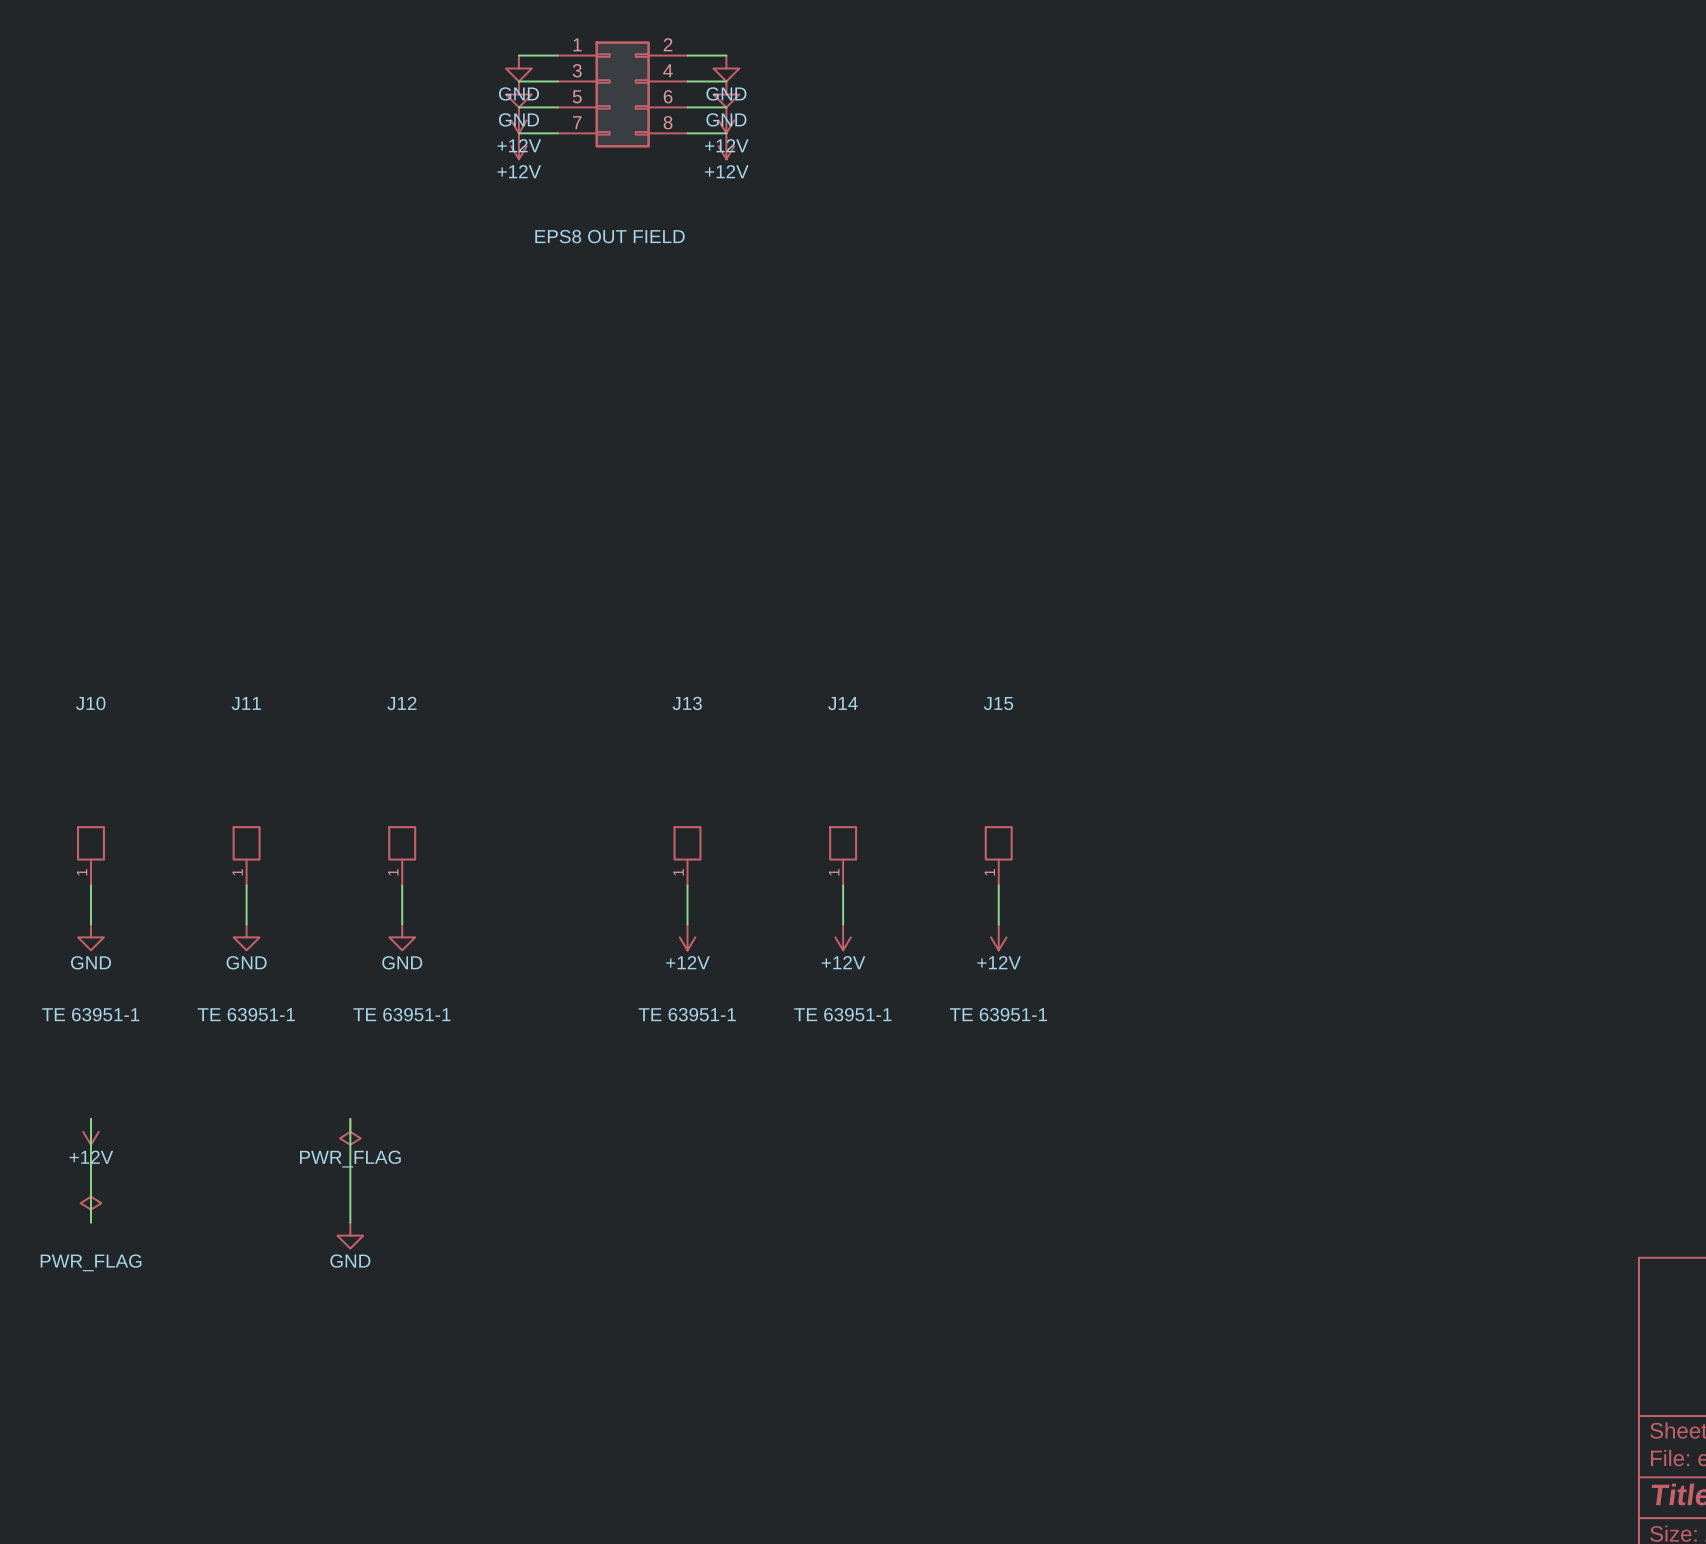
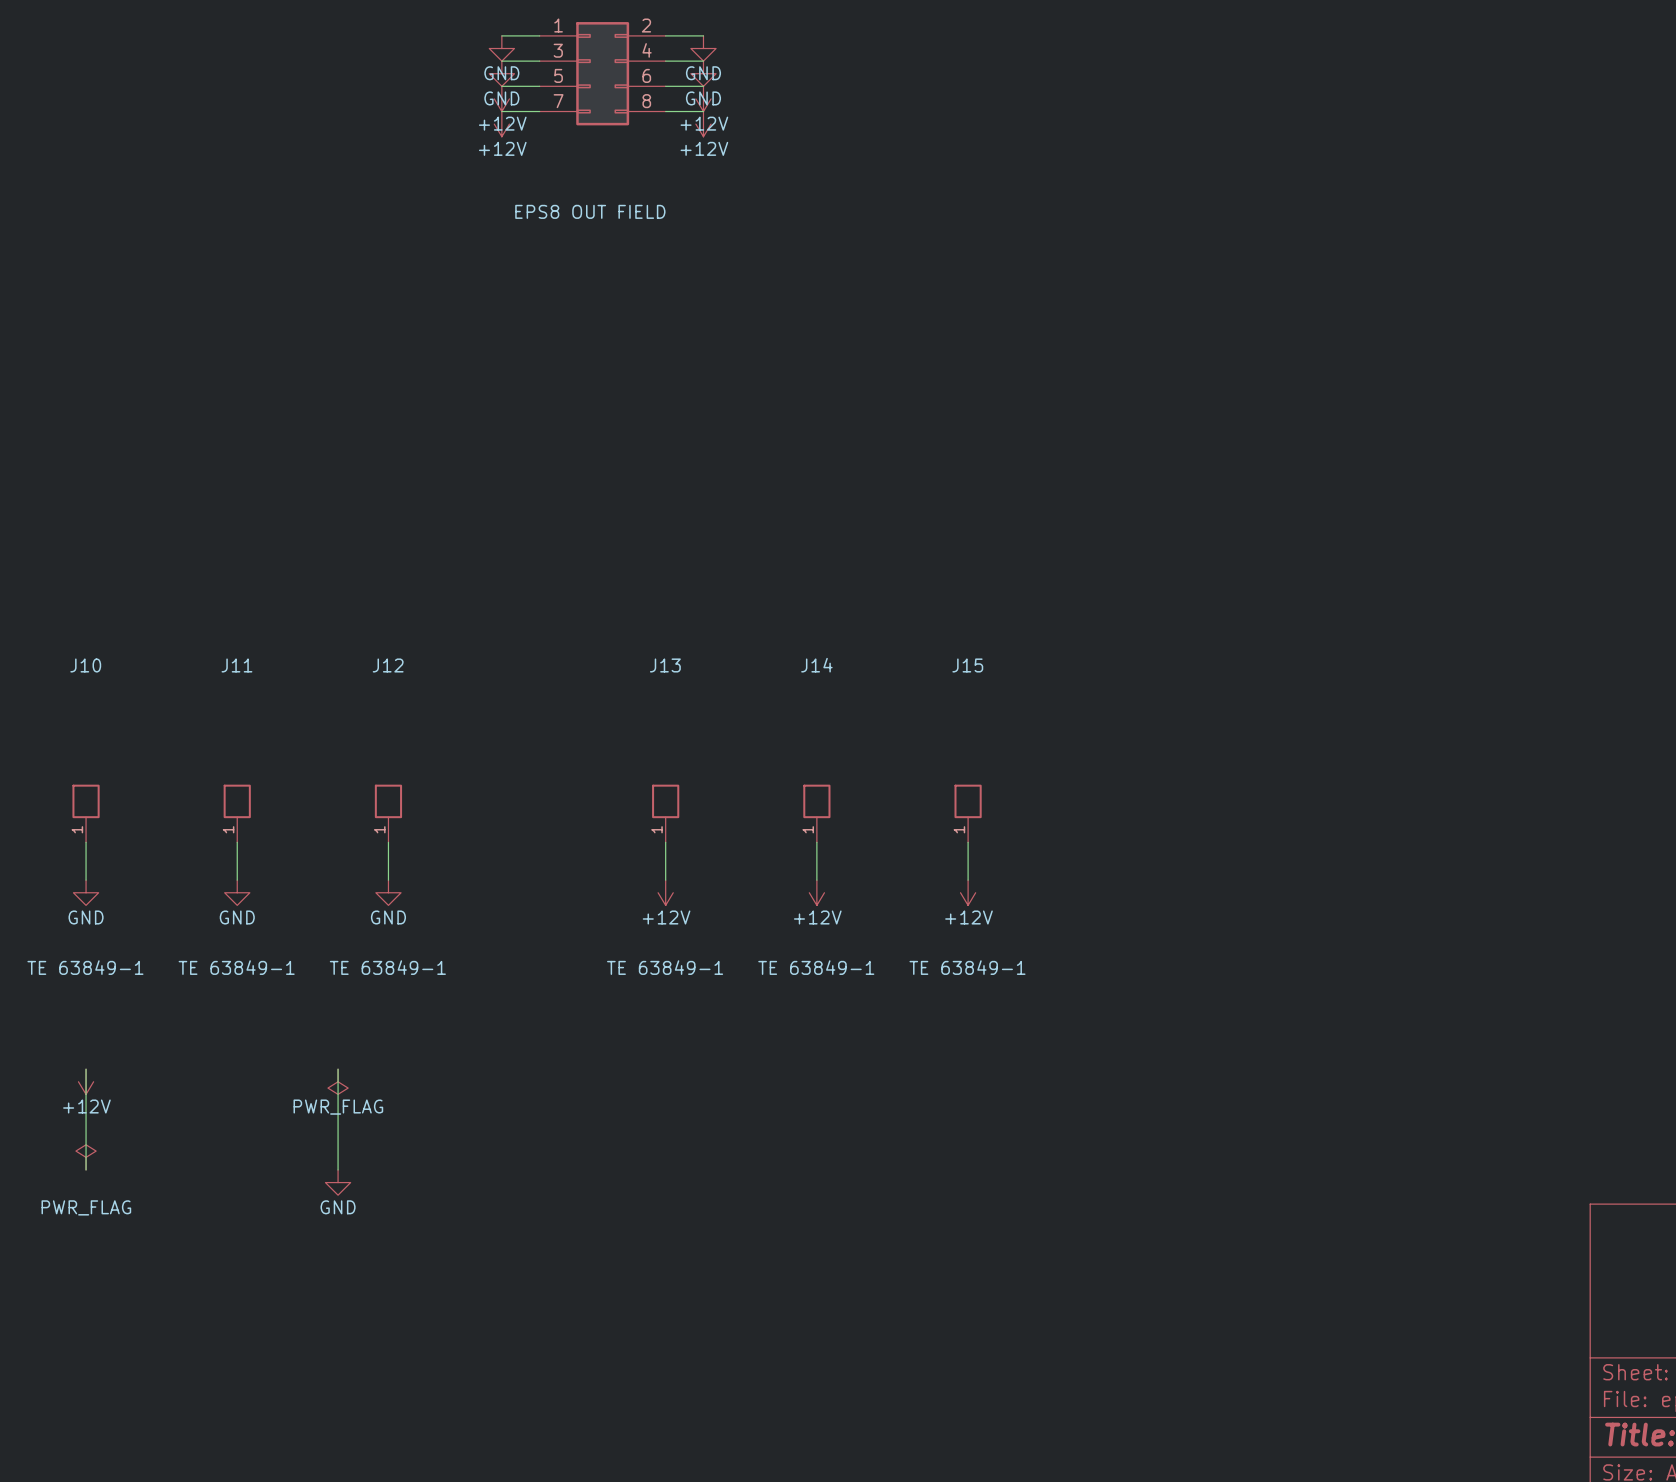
J10 value: TE 63951-1 (90, 1014) -> TE 63849-1 (85, 967)
J11 value: TE 63951-1 (246, 1014) -> TE 63849-1 (236, 967)
J12 value: TE 63951-1 (401, 1014) -> TE 63849-1 (387, 967)
J13 value: TE 63951-1 (687, 1014) -> TE 63849-1 (665, 967)
J14 value: TE 63951-1 (842, 1014) -> TE 63849-1 (816, 967)
J15 value: TE 63951-1 (998, 1014) -> TE 63849-1 (967, 967)

